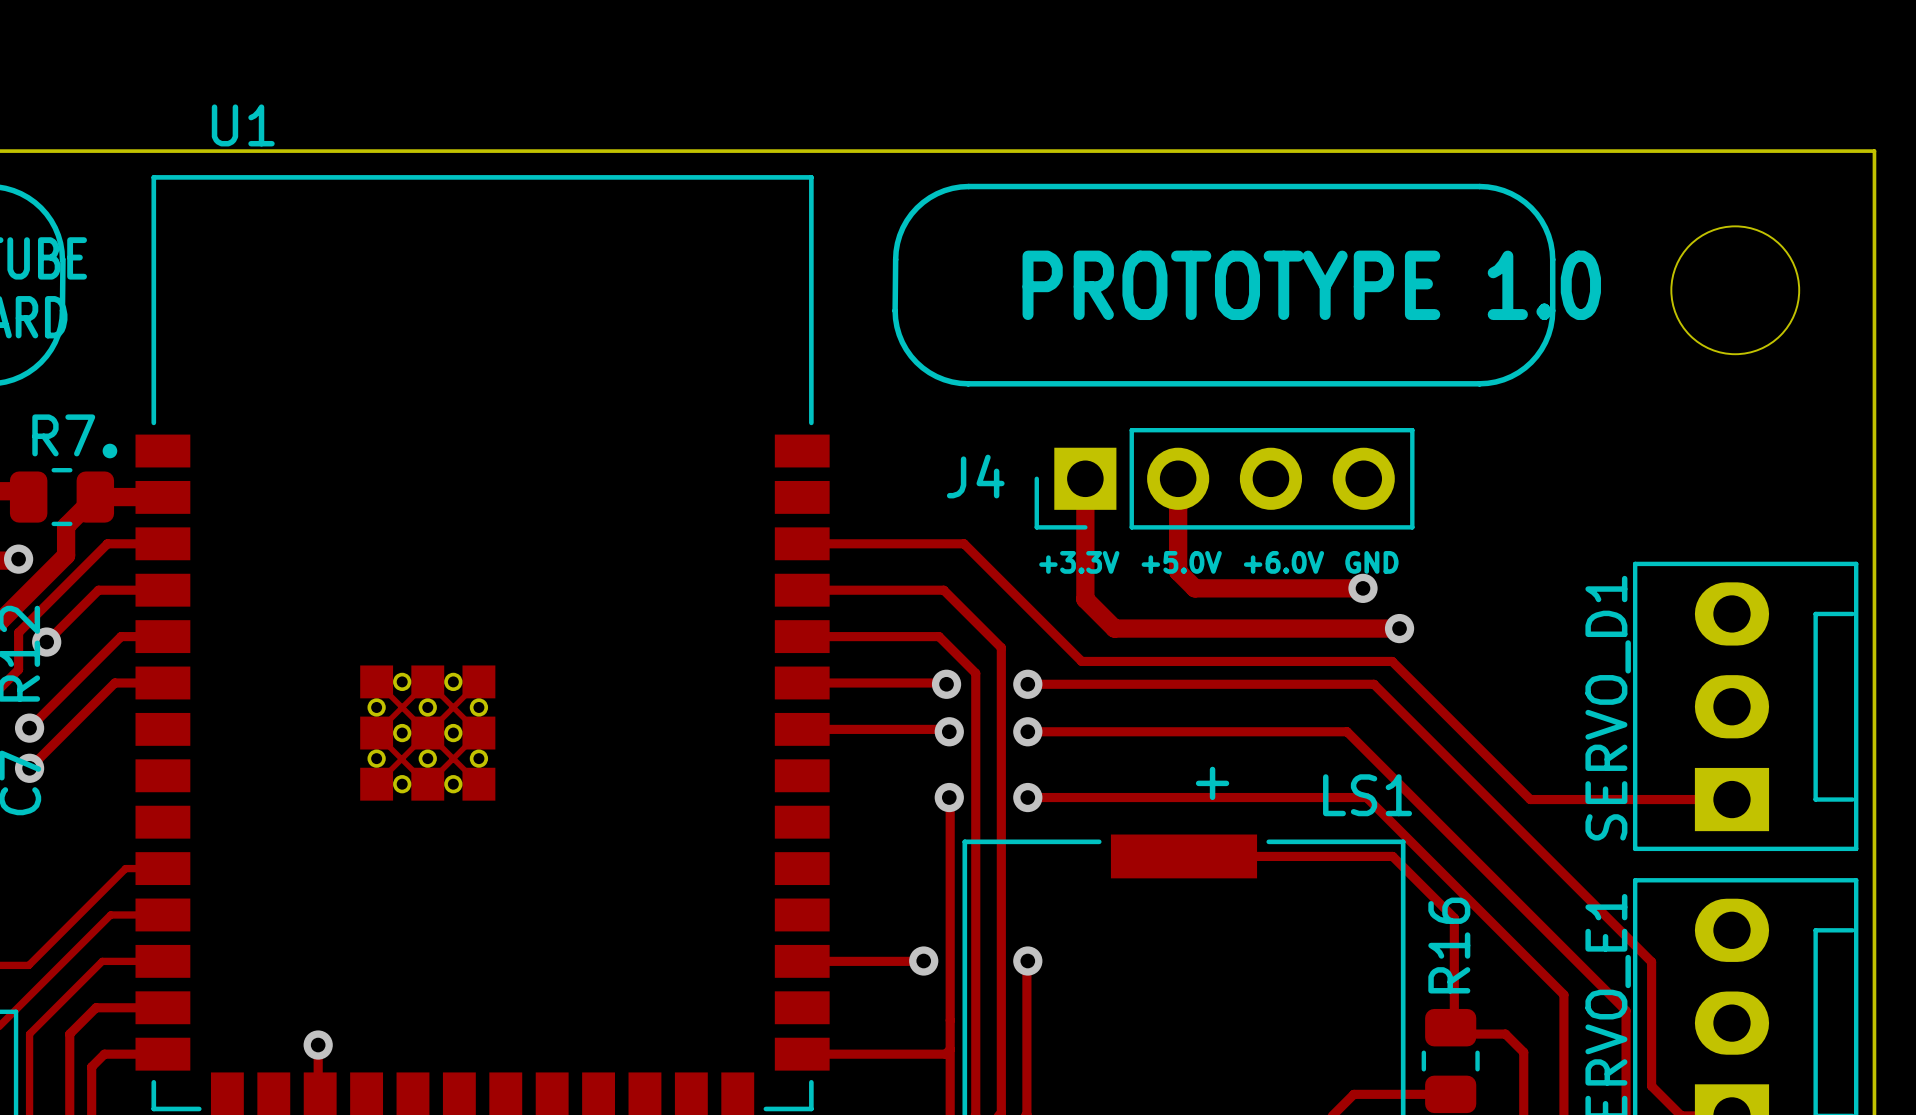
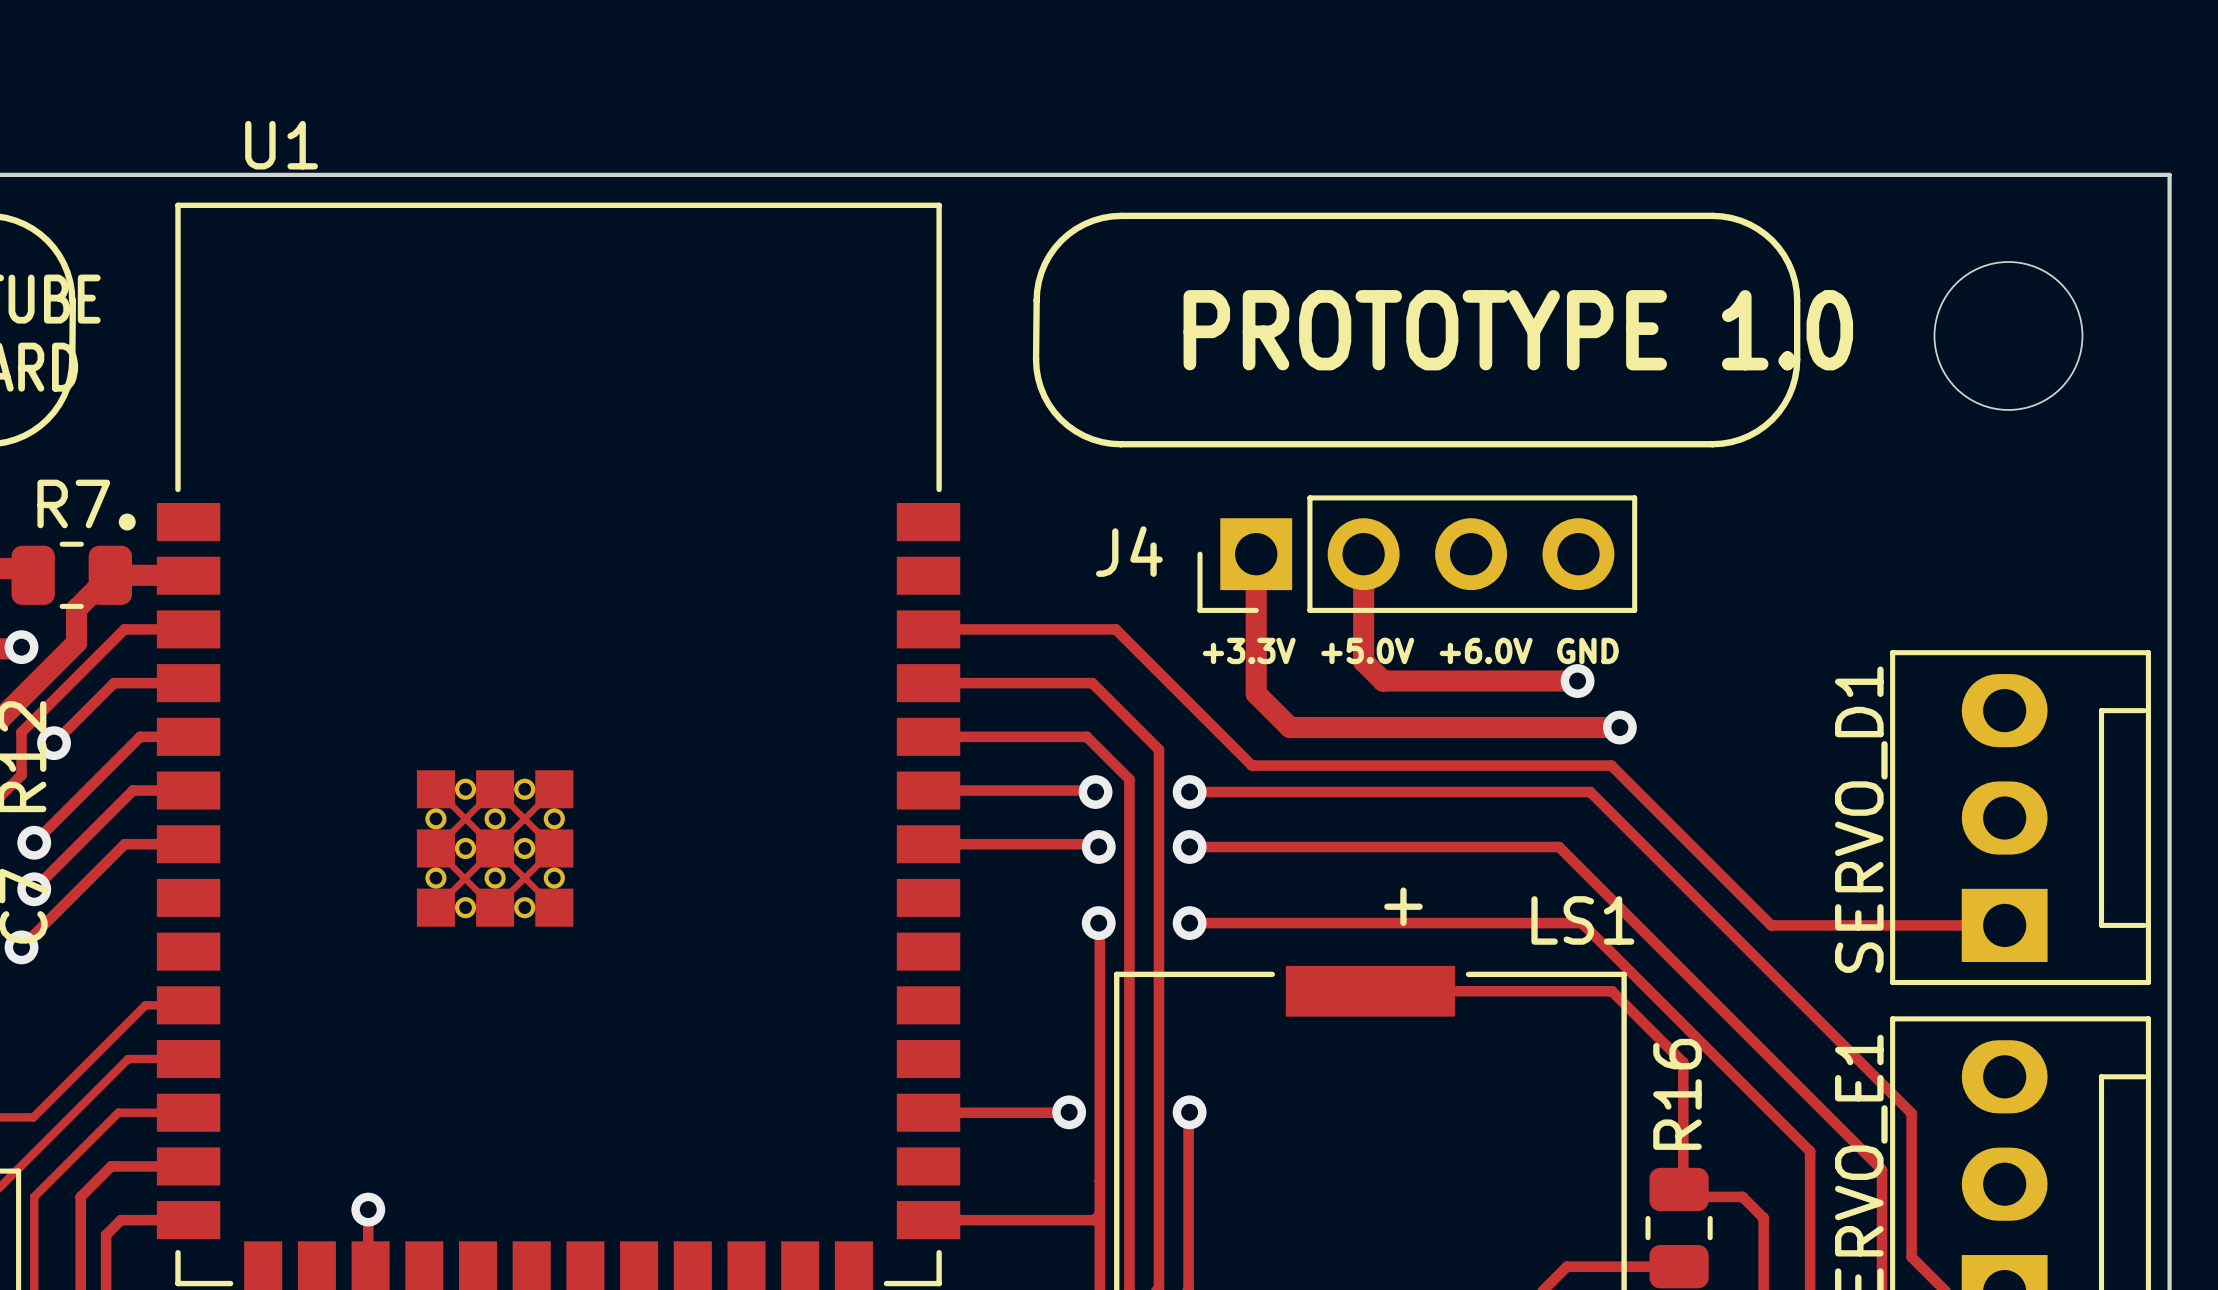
track: none -> (188, 844) (124, 844) (21, 947)
via: none -> (21, 947)

